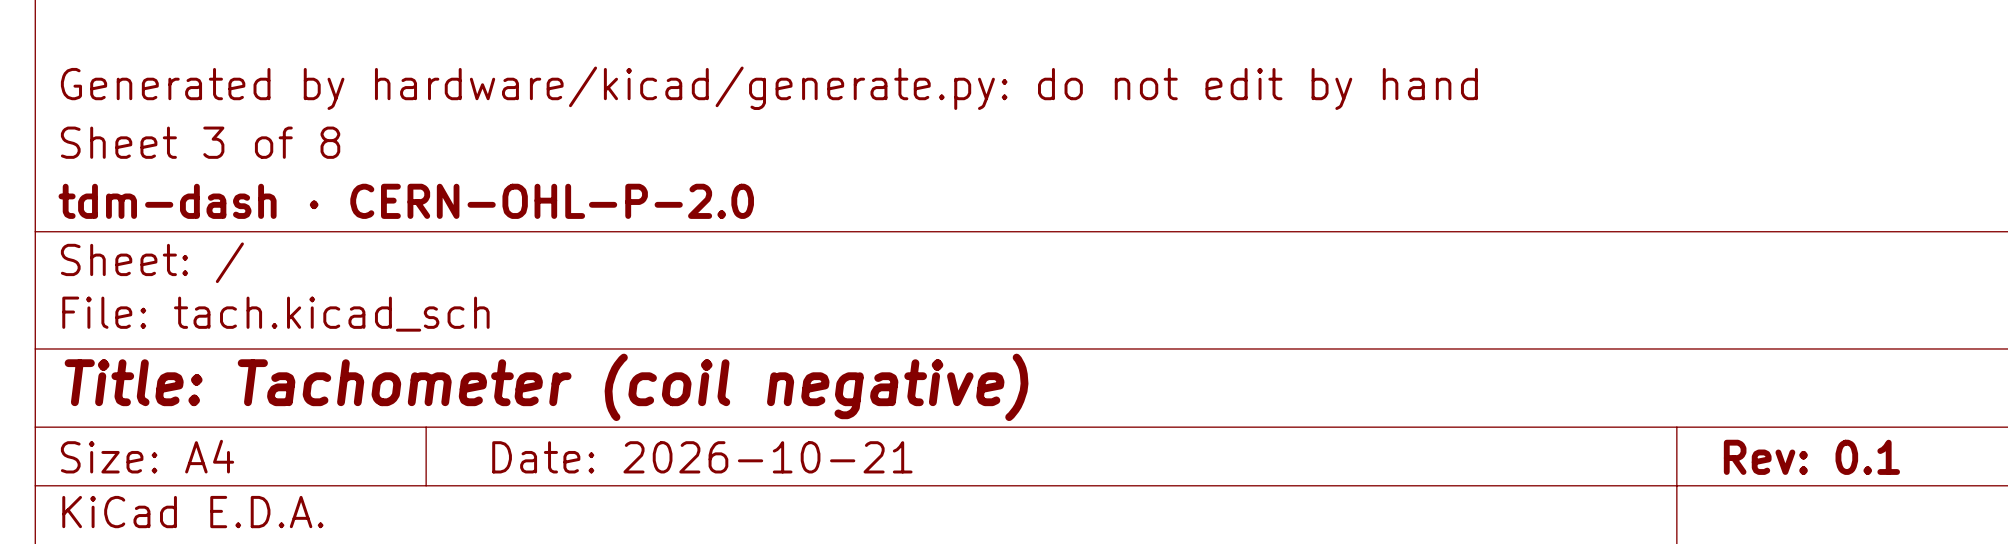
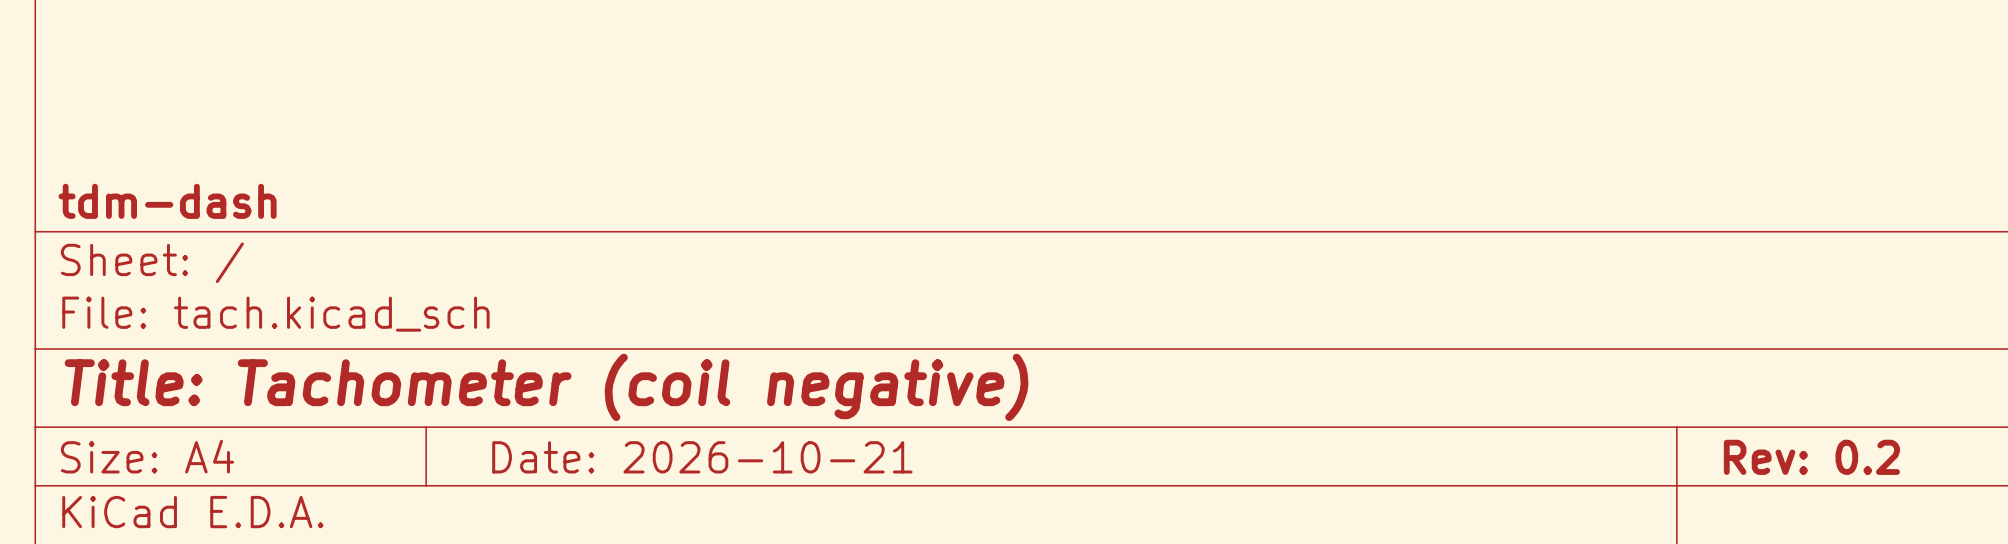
title block: Generated by hardware/kicad/generate.py: do not edit by hand (769, 88) -> none
title block: Sheet 3 of 8 (200, 142) -> none
title block: tdm-dash · CERN-OHL-P-2.0 (406, 201) -> tdm-dash (167, 201)
title block: Rev: 0.1 (1811, 457) -> Rev: 0.2 (1811, 457)

